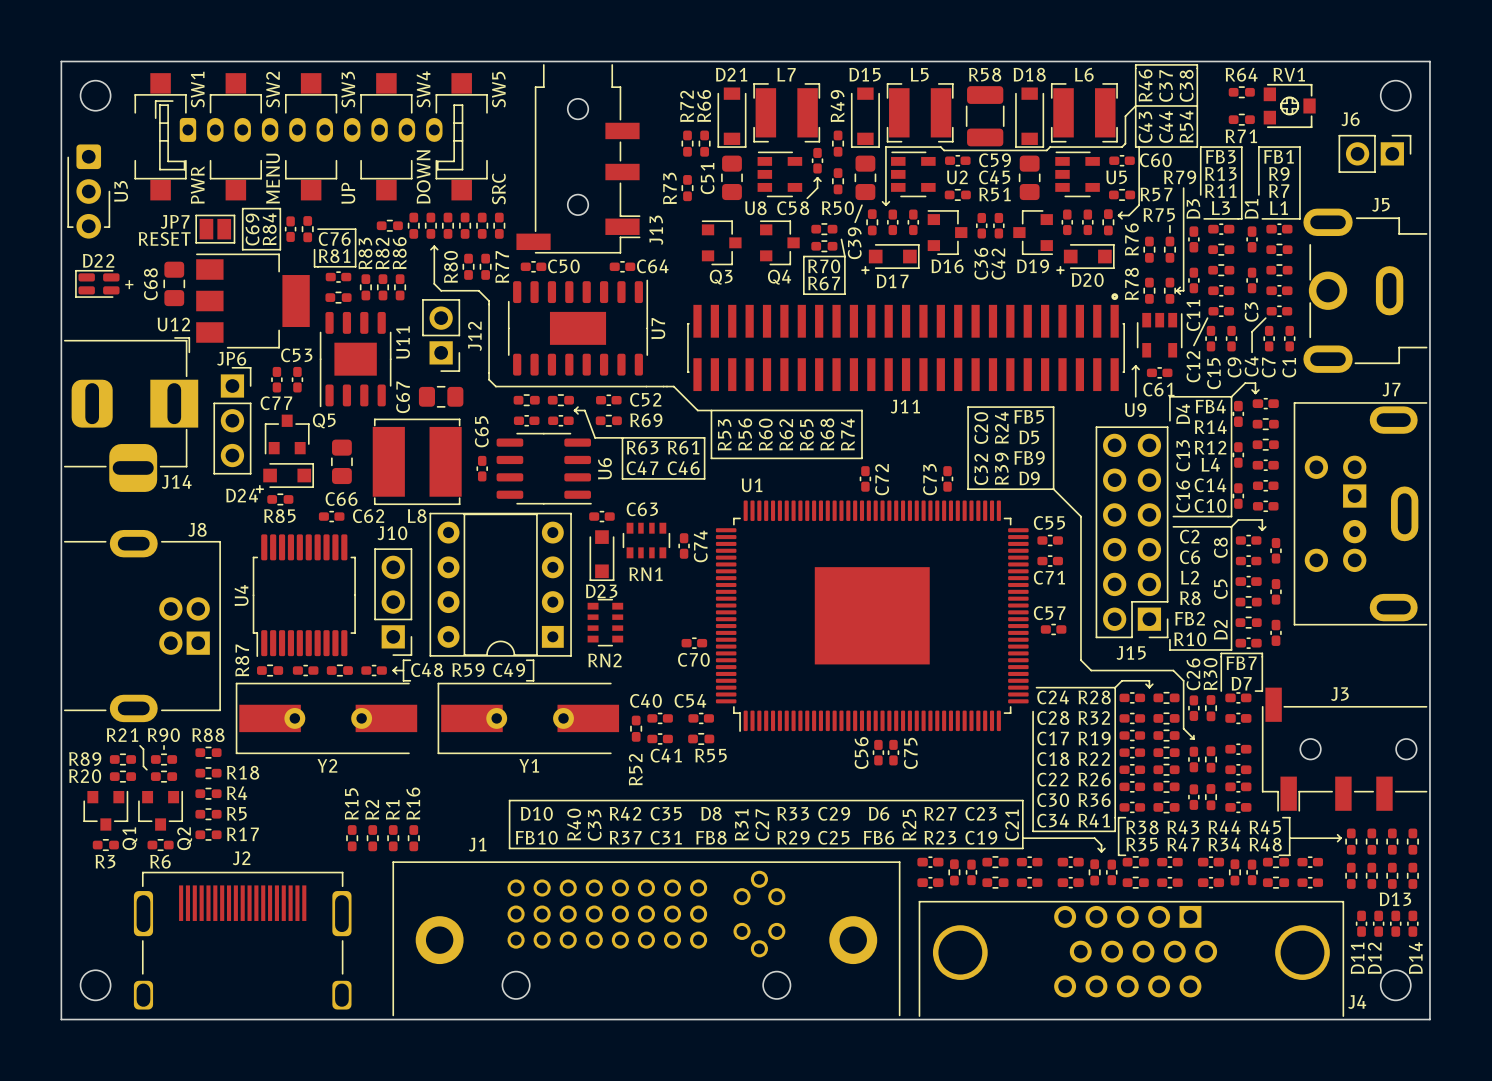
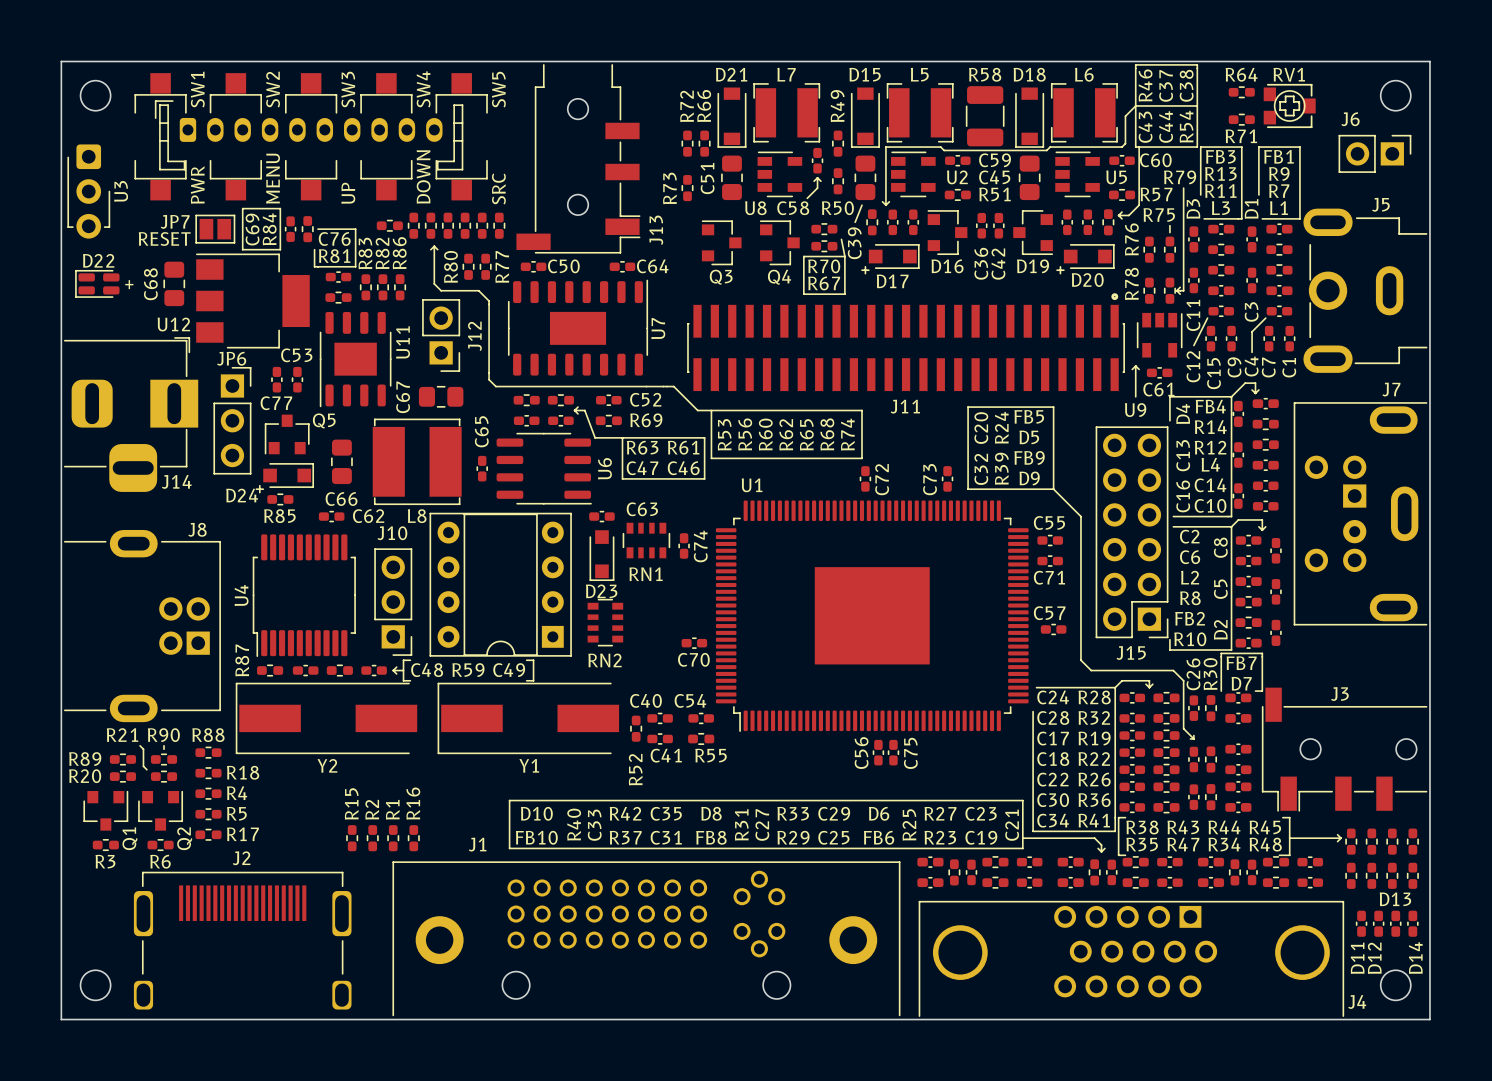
RV1 footprint: [1263, 83, 1316, 129] -> [1263, 83, 1316, 129]
Y2 footprint: [235, 682, 418, 755] -> [235, 682, 418, 755]
Y1 footprint: [437, 682, 620, 755] -> [437, 682, 620, 755]

